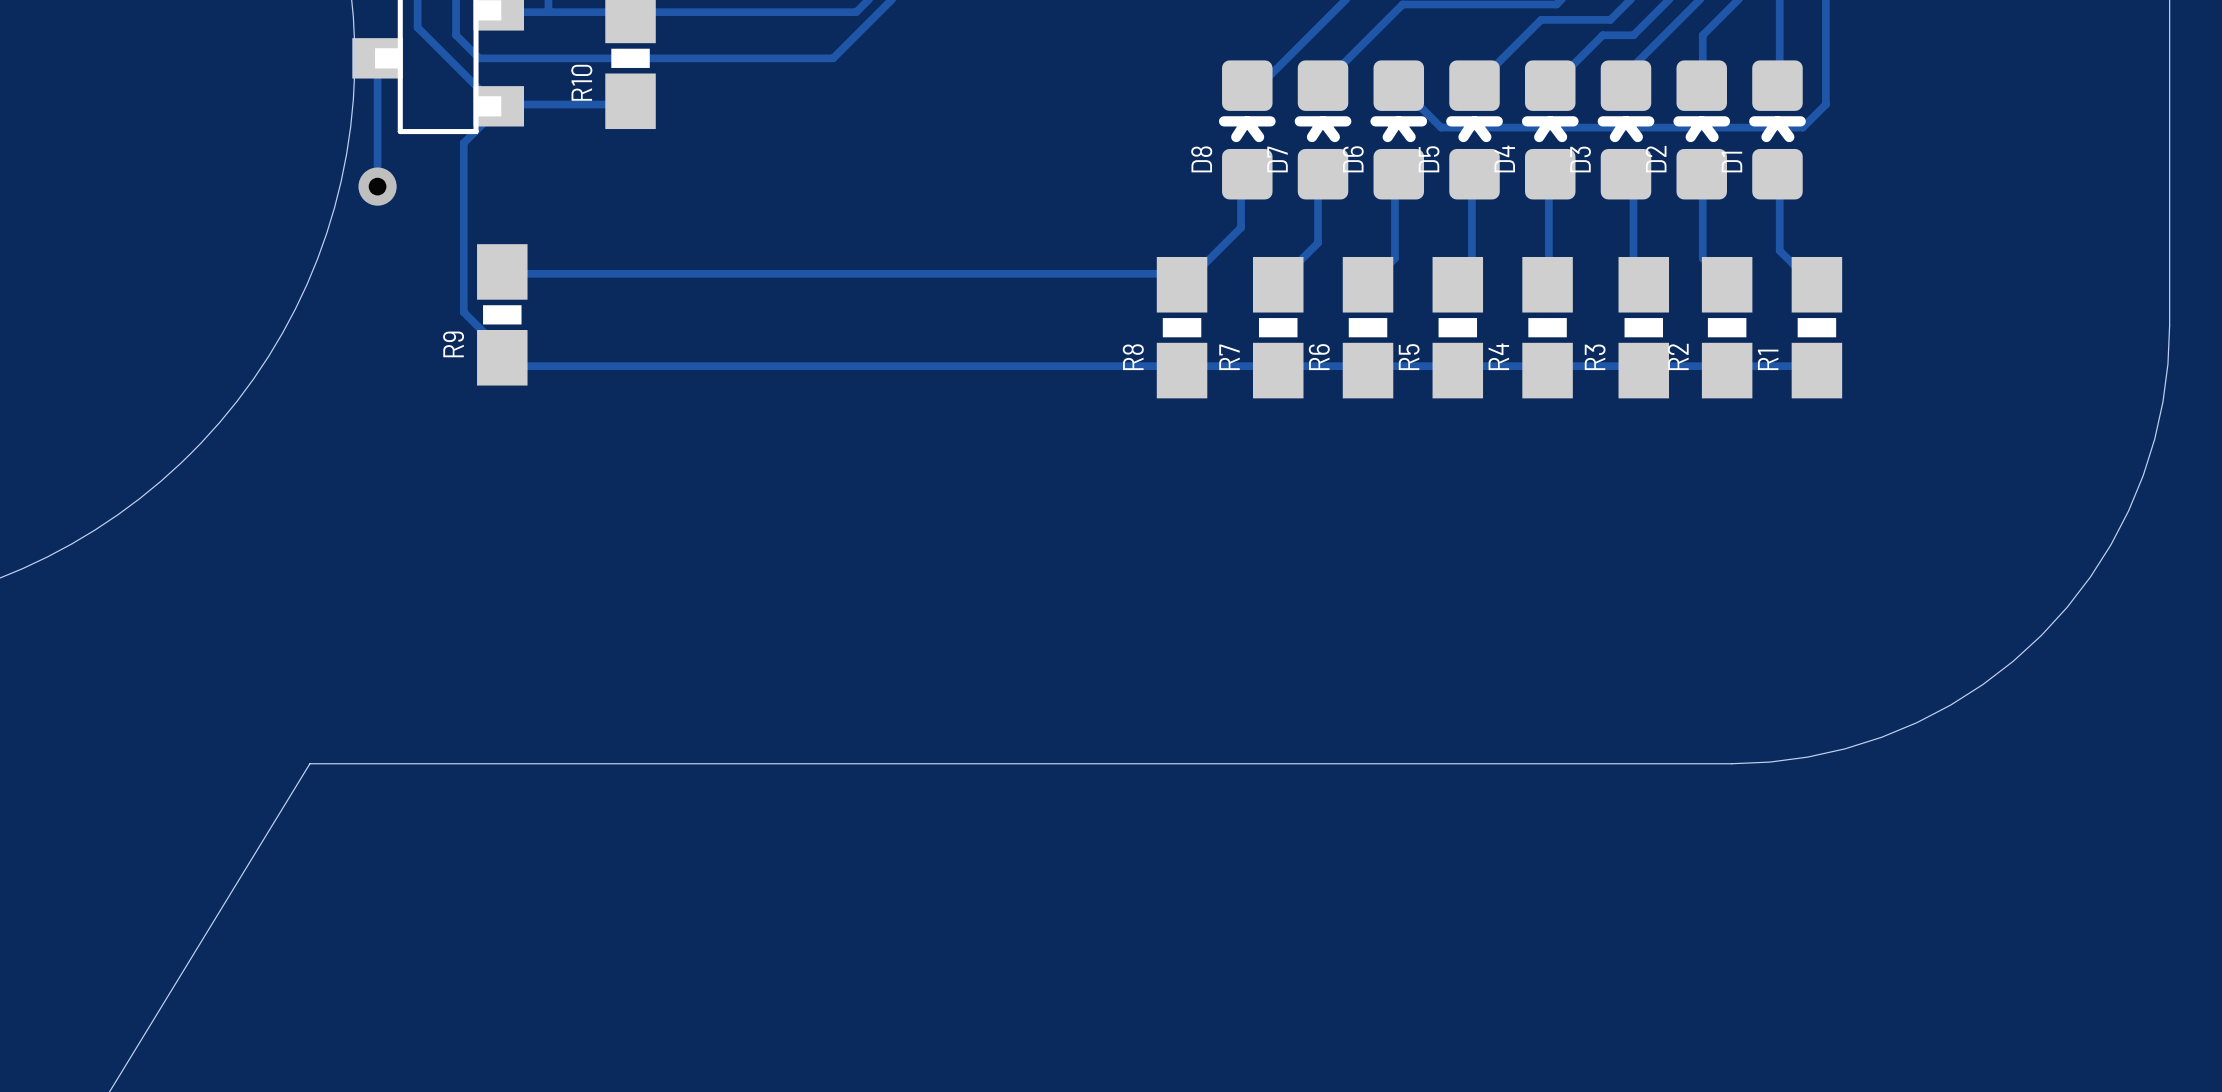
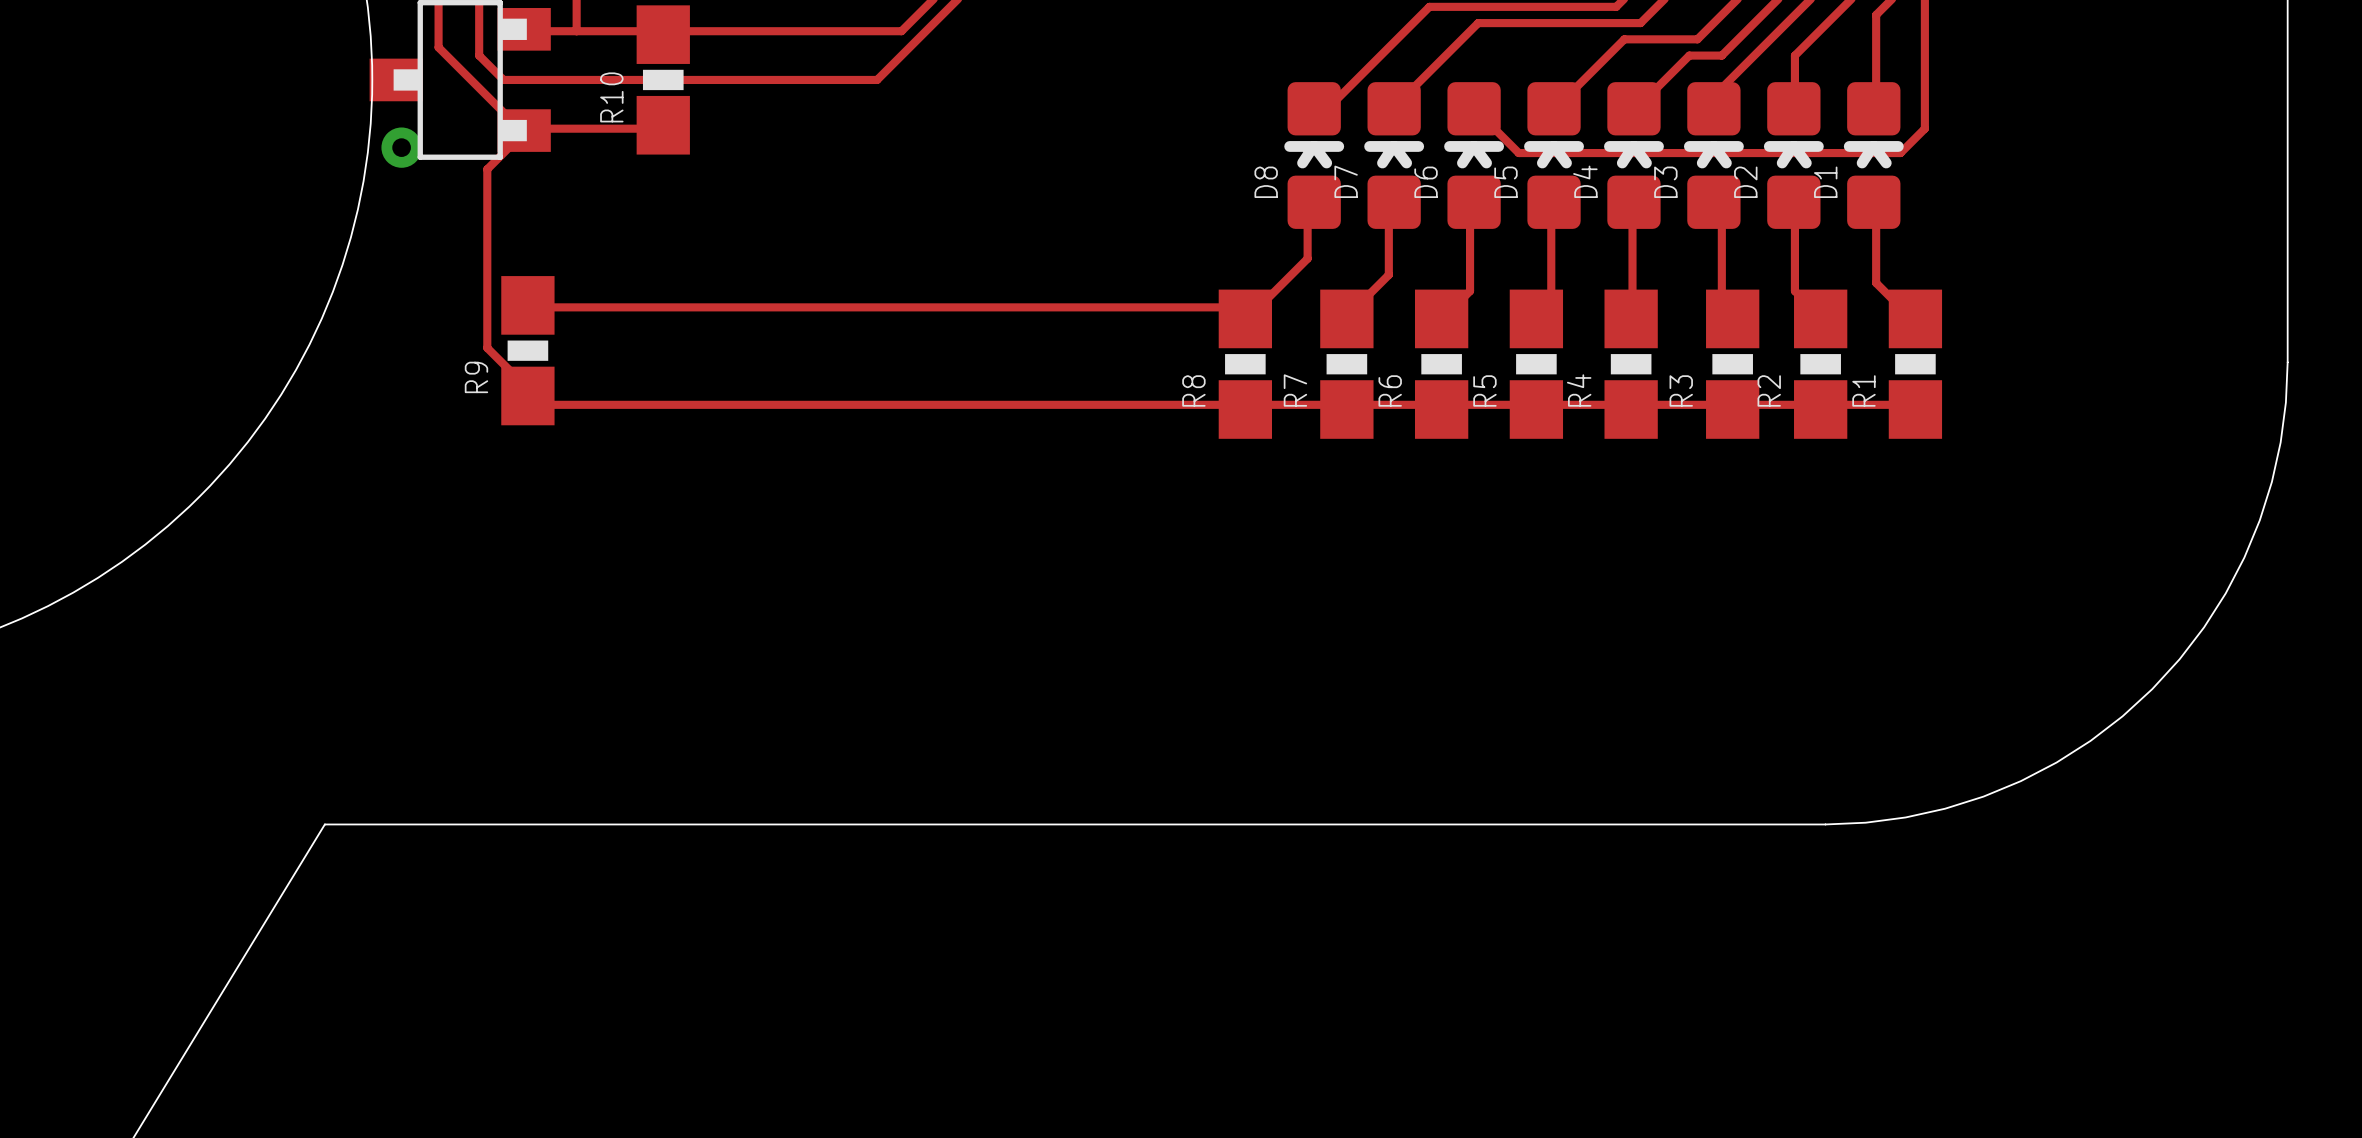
track: (377, 58) (377, 186) -> none
via position: (377, 186) -> (401, 147)

